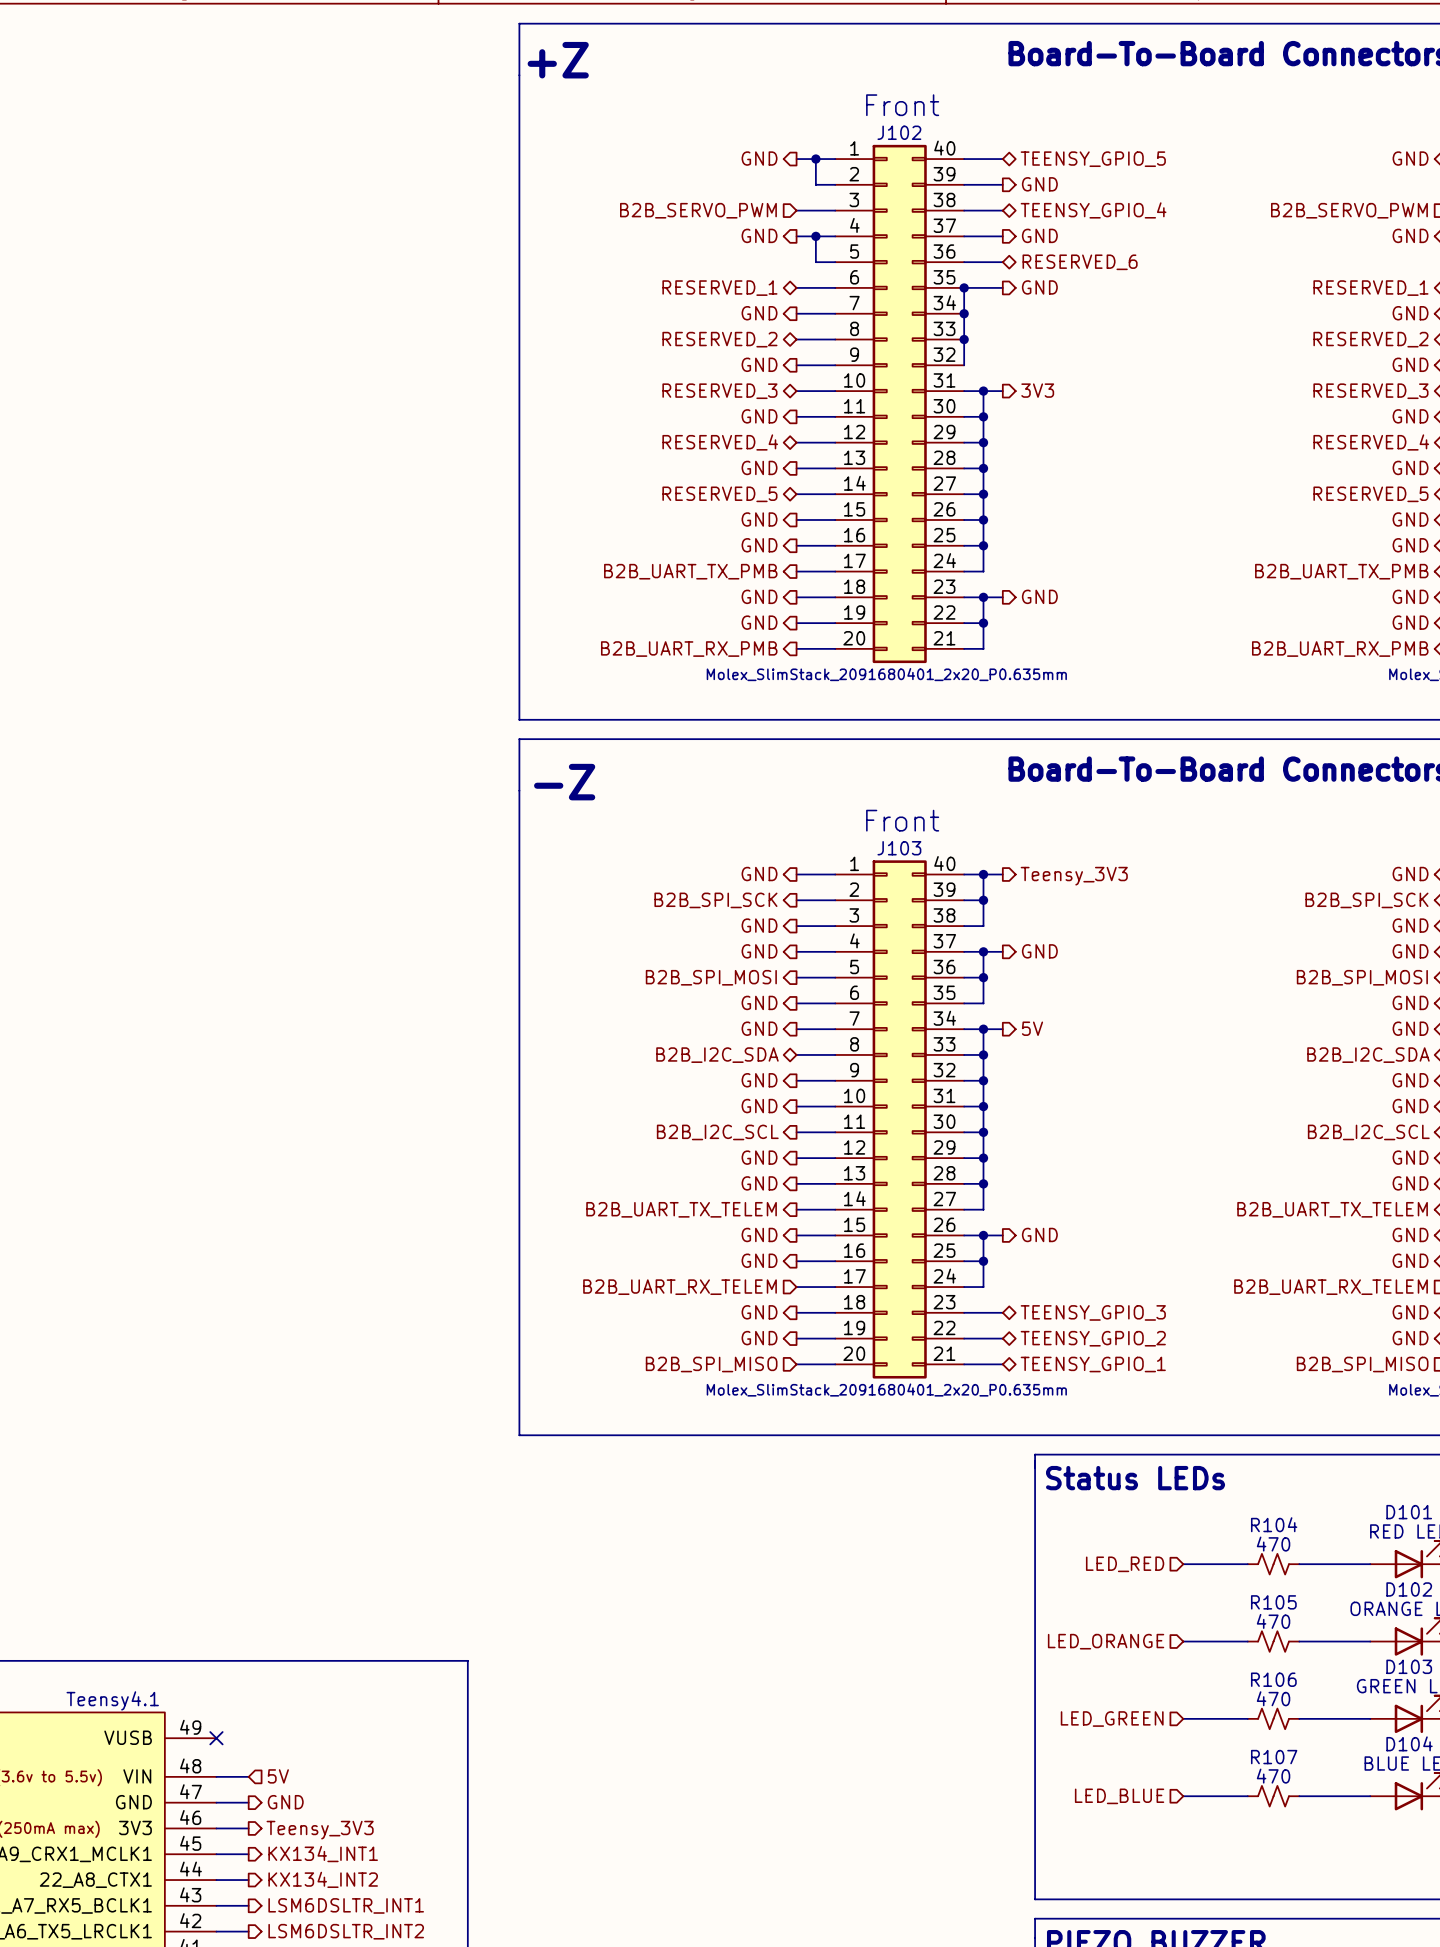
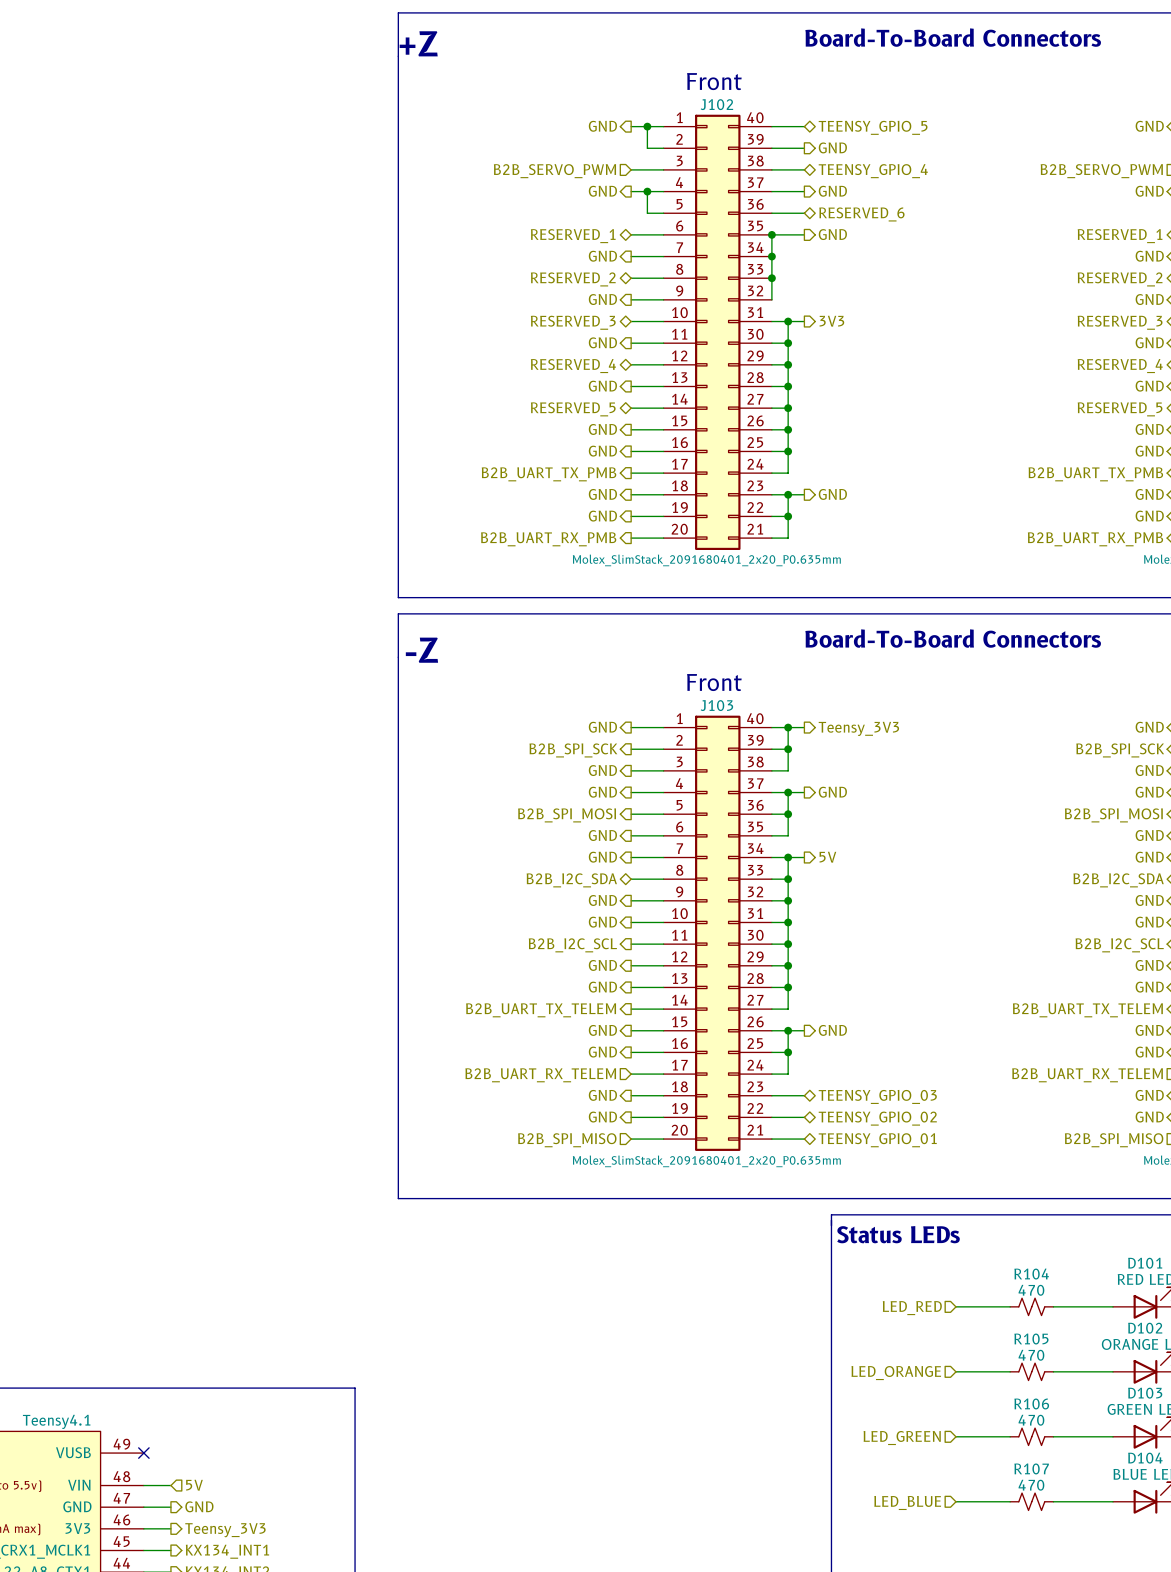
hierarchical label: TEENSY_GPIO_3 (1093, 1312) -> TEENSY_GPIO_03 (877, 1096)
hierarchical label: TEENSY_GPIO_2 (1093, 1338) -> TEENSY_GPIO_02 (877, 1118)
hierarchical label: TEENSY_GPIO_1 (1093, 1364) -> TEENSY_GPIO_01 (877, 1140)

